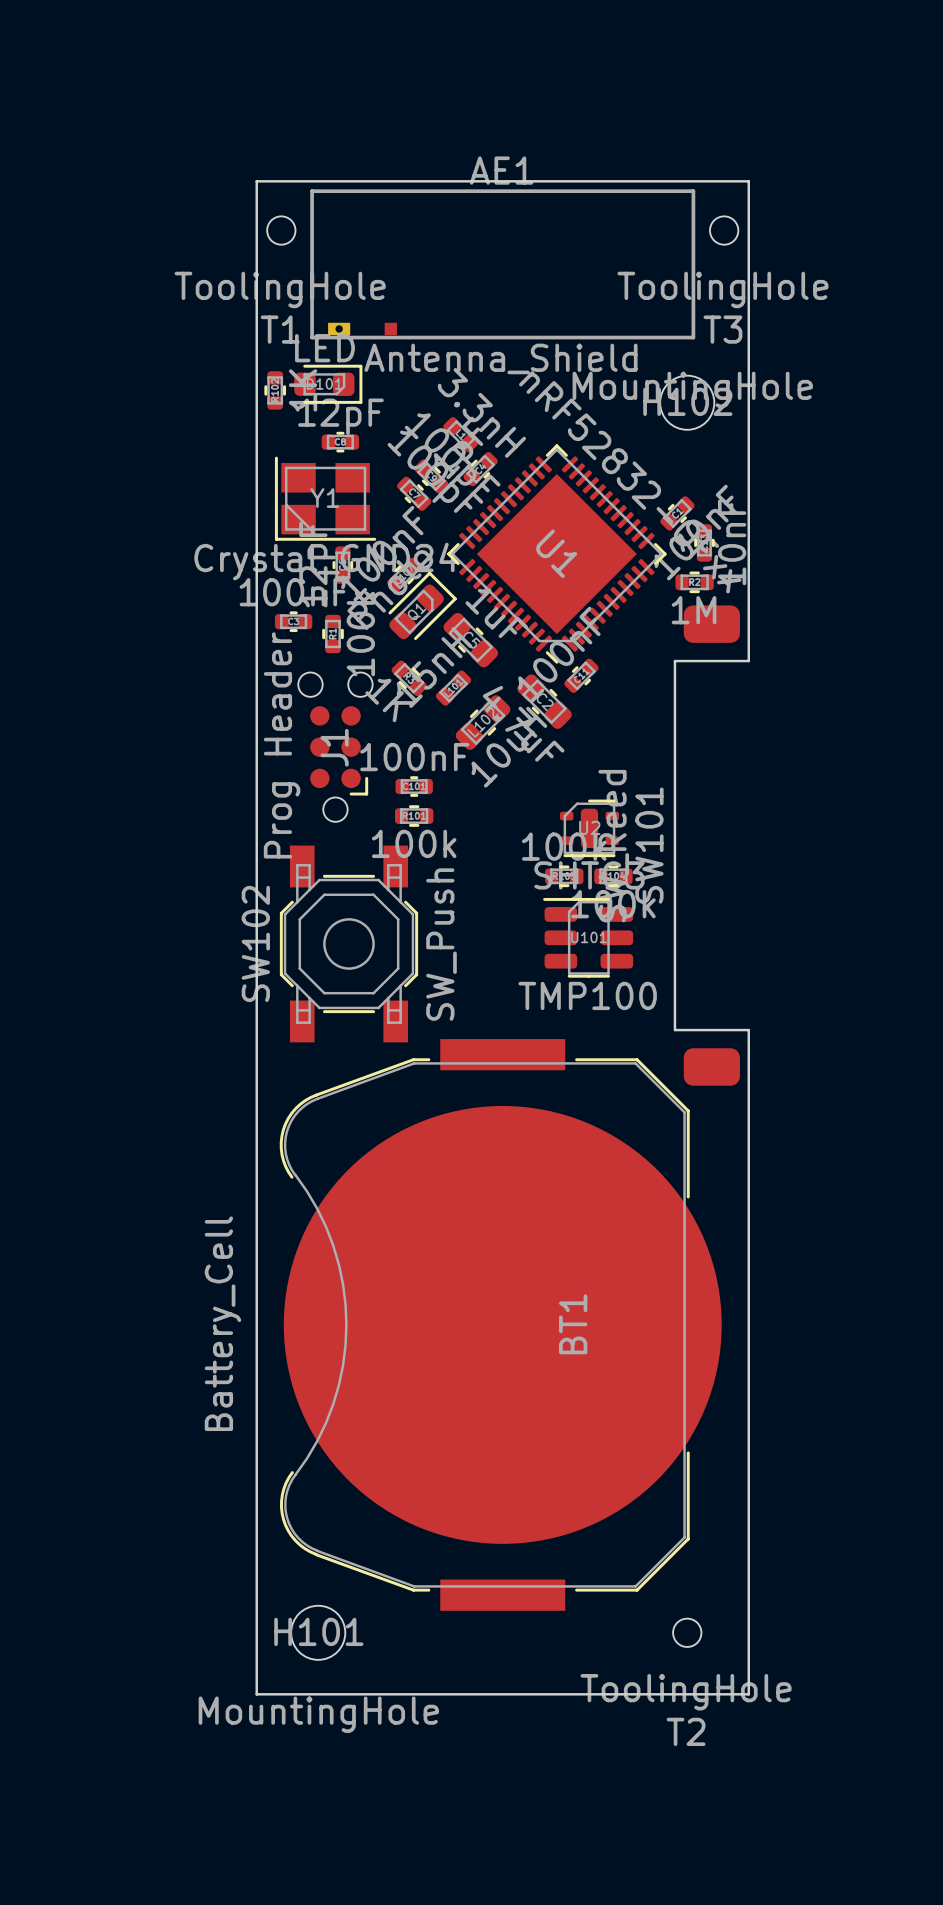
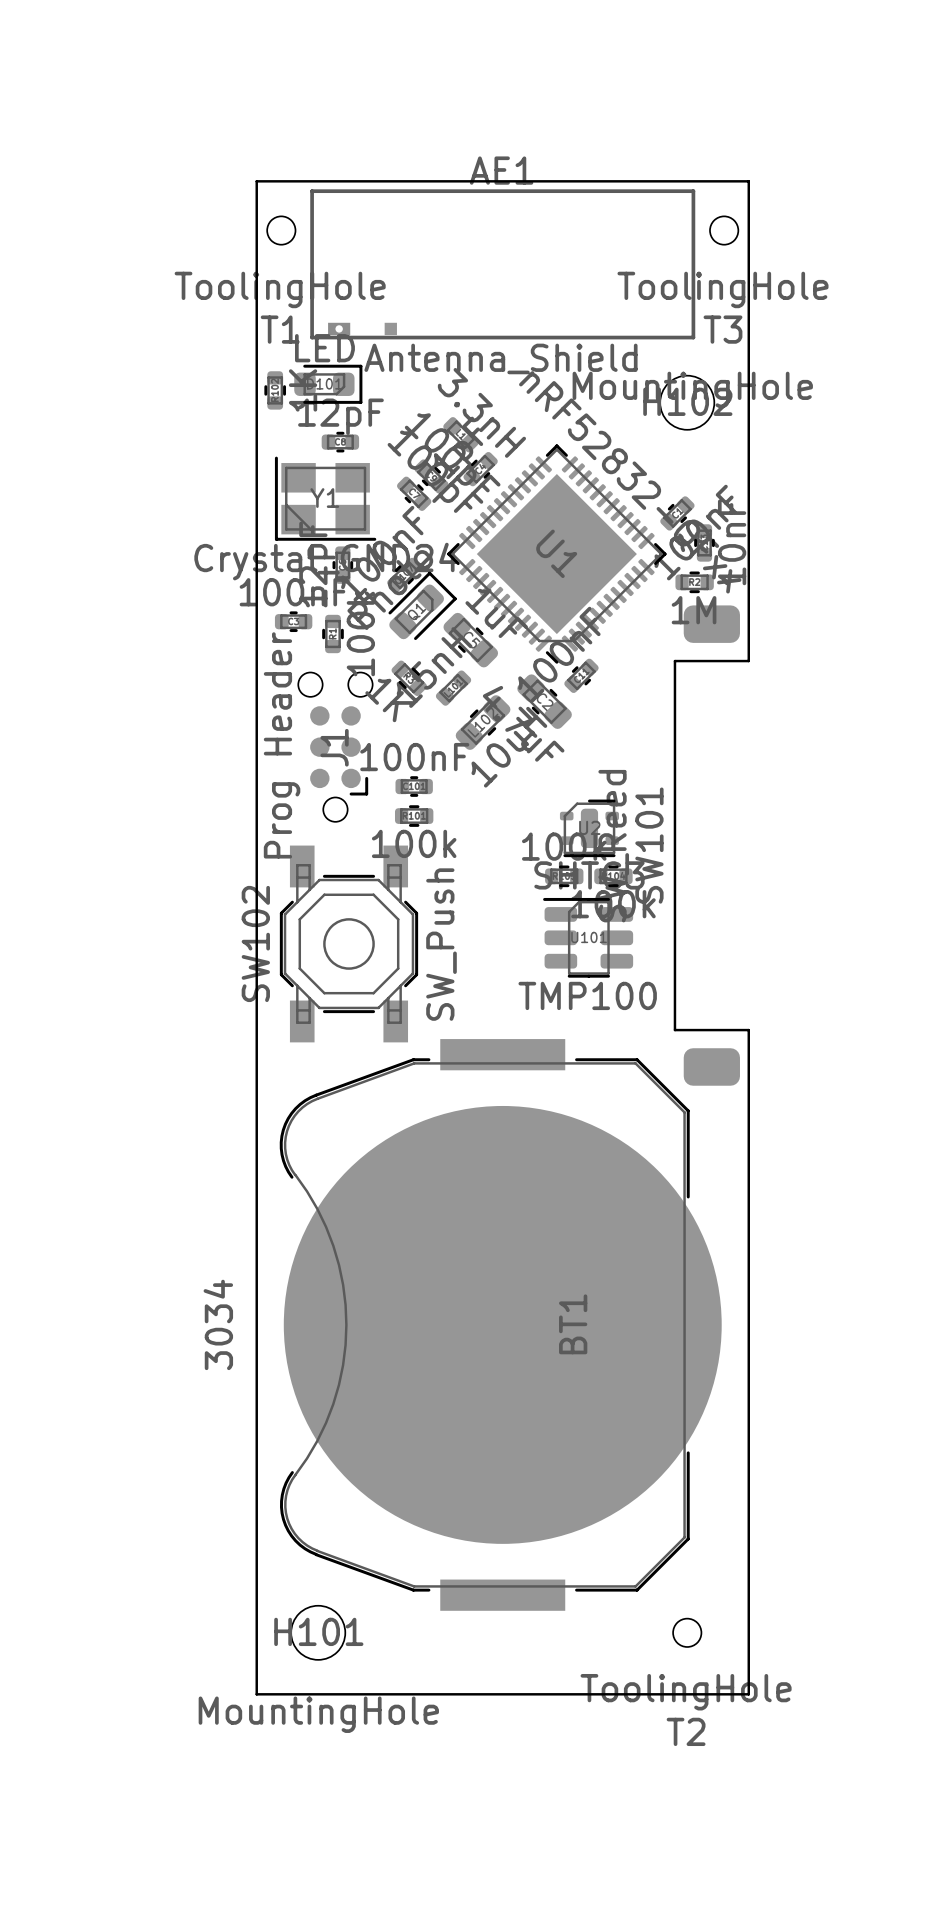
BT1 value: Battery_Cell (223, 1323) -> 3034 (218, 1324)

